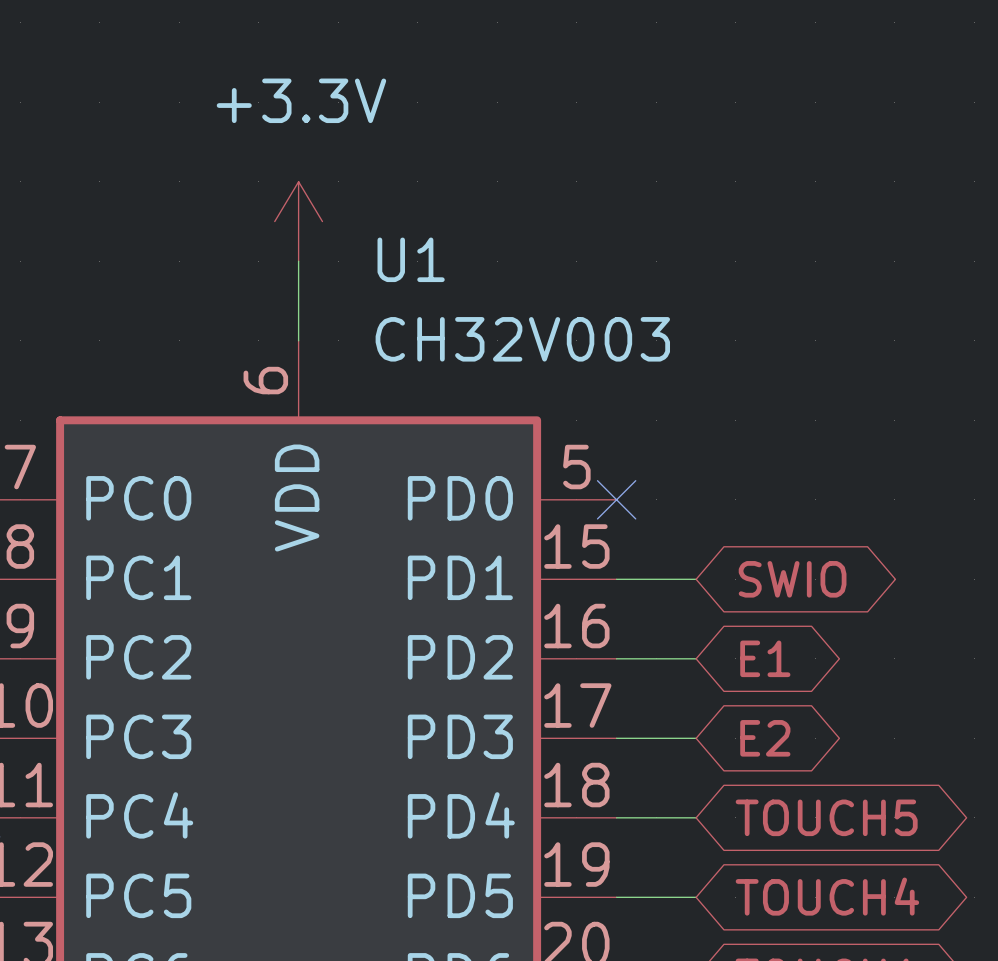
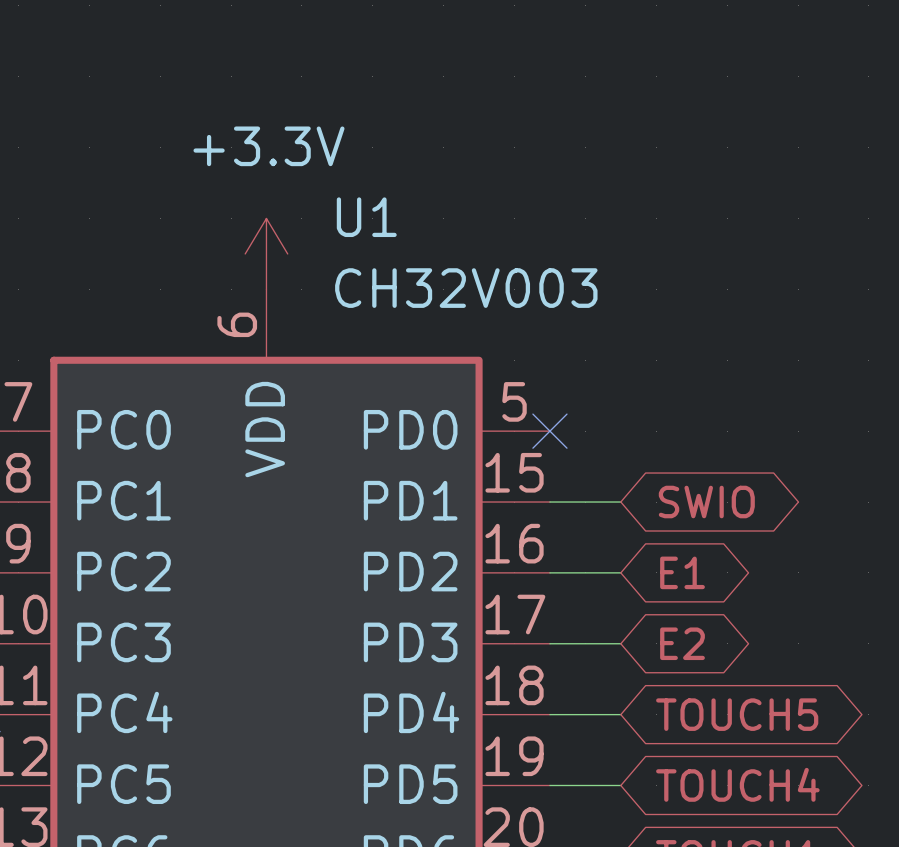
power symbol position: +3.3V (298, 221) -> +3.3V (266, 253)

